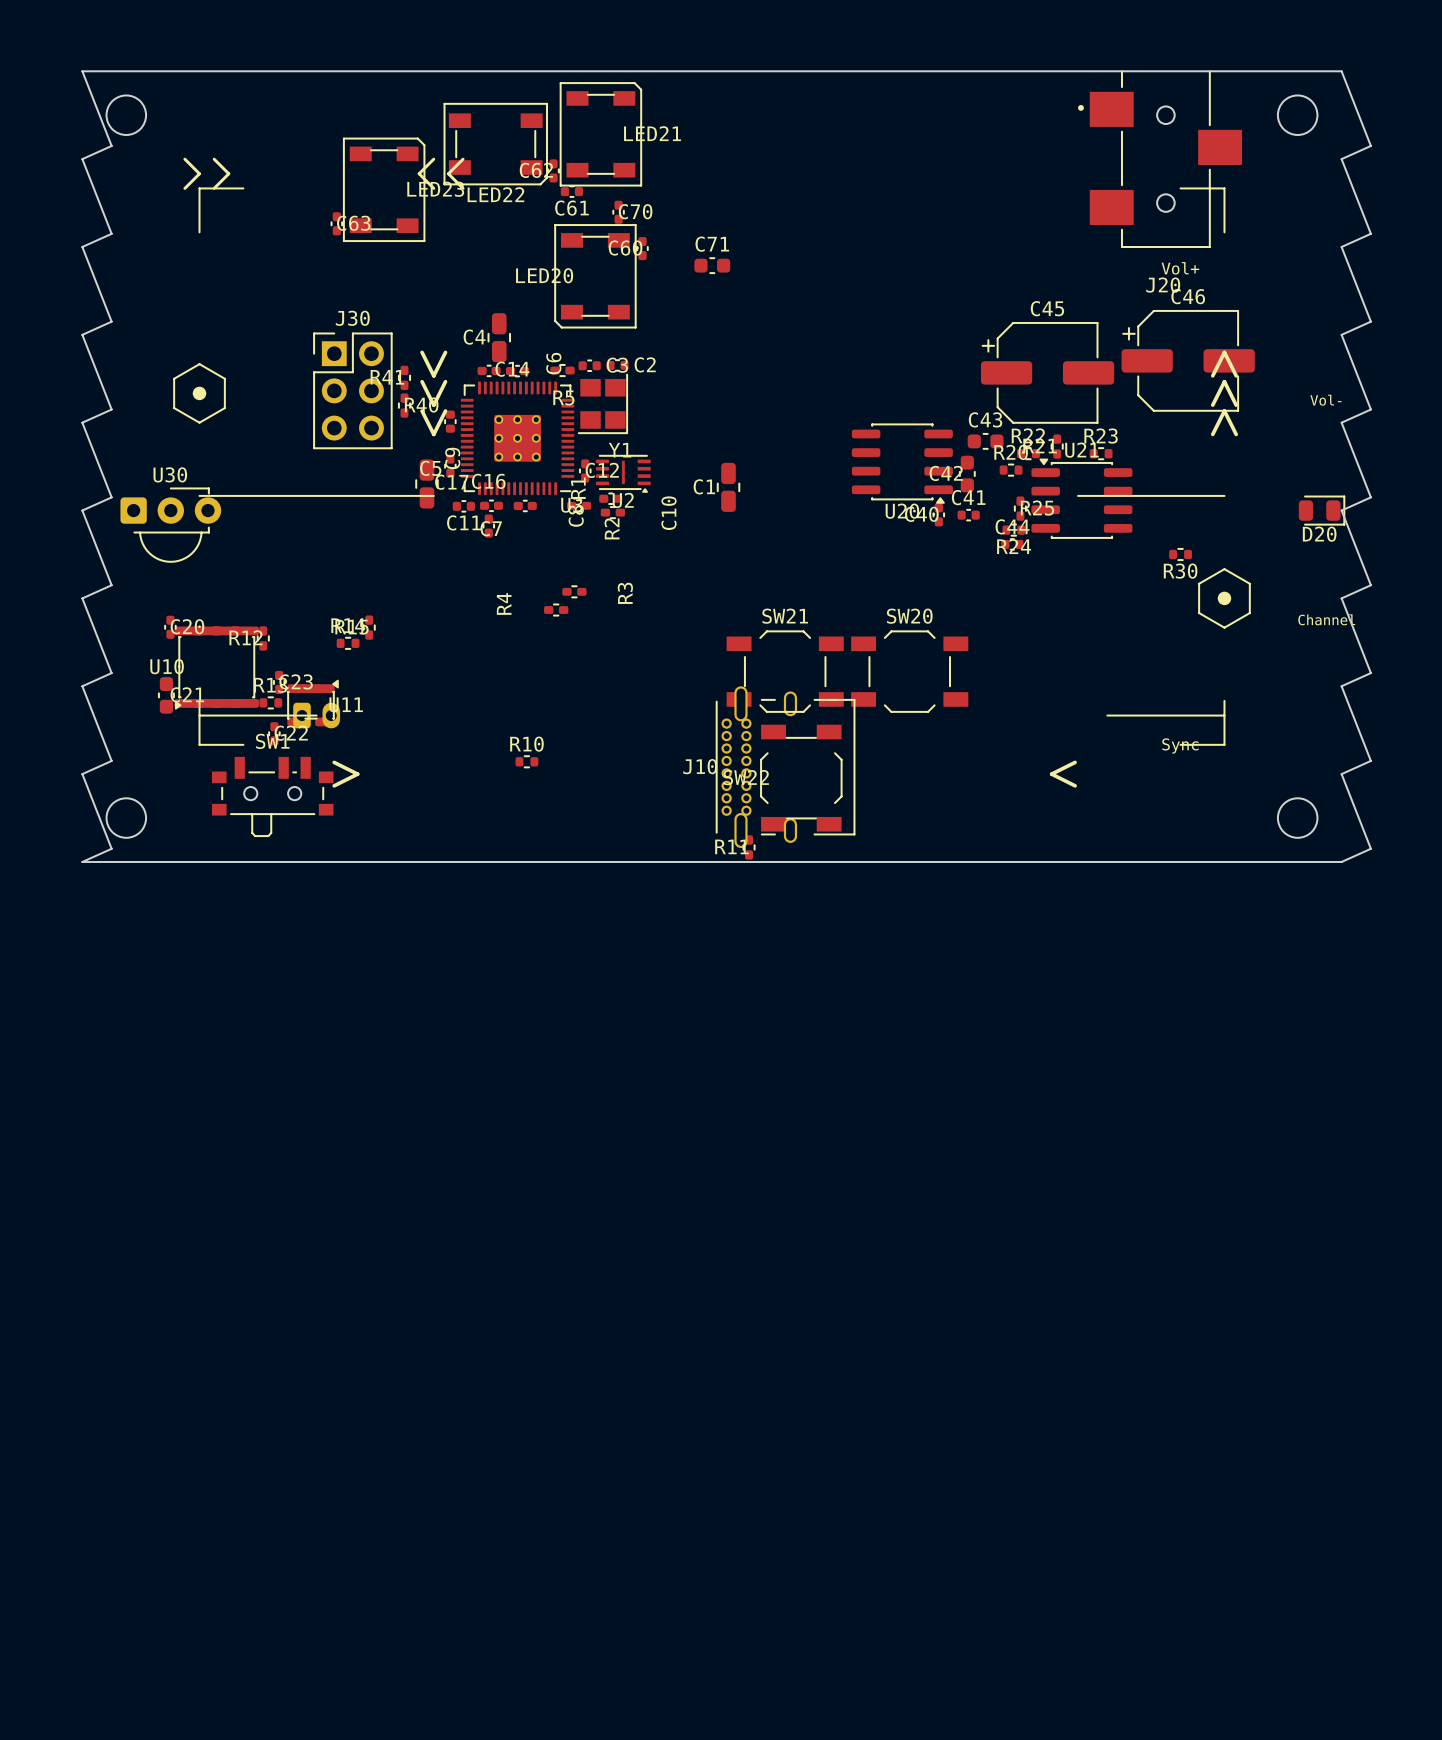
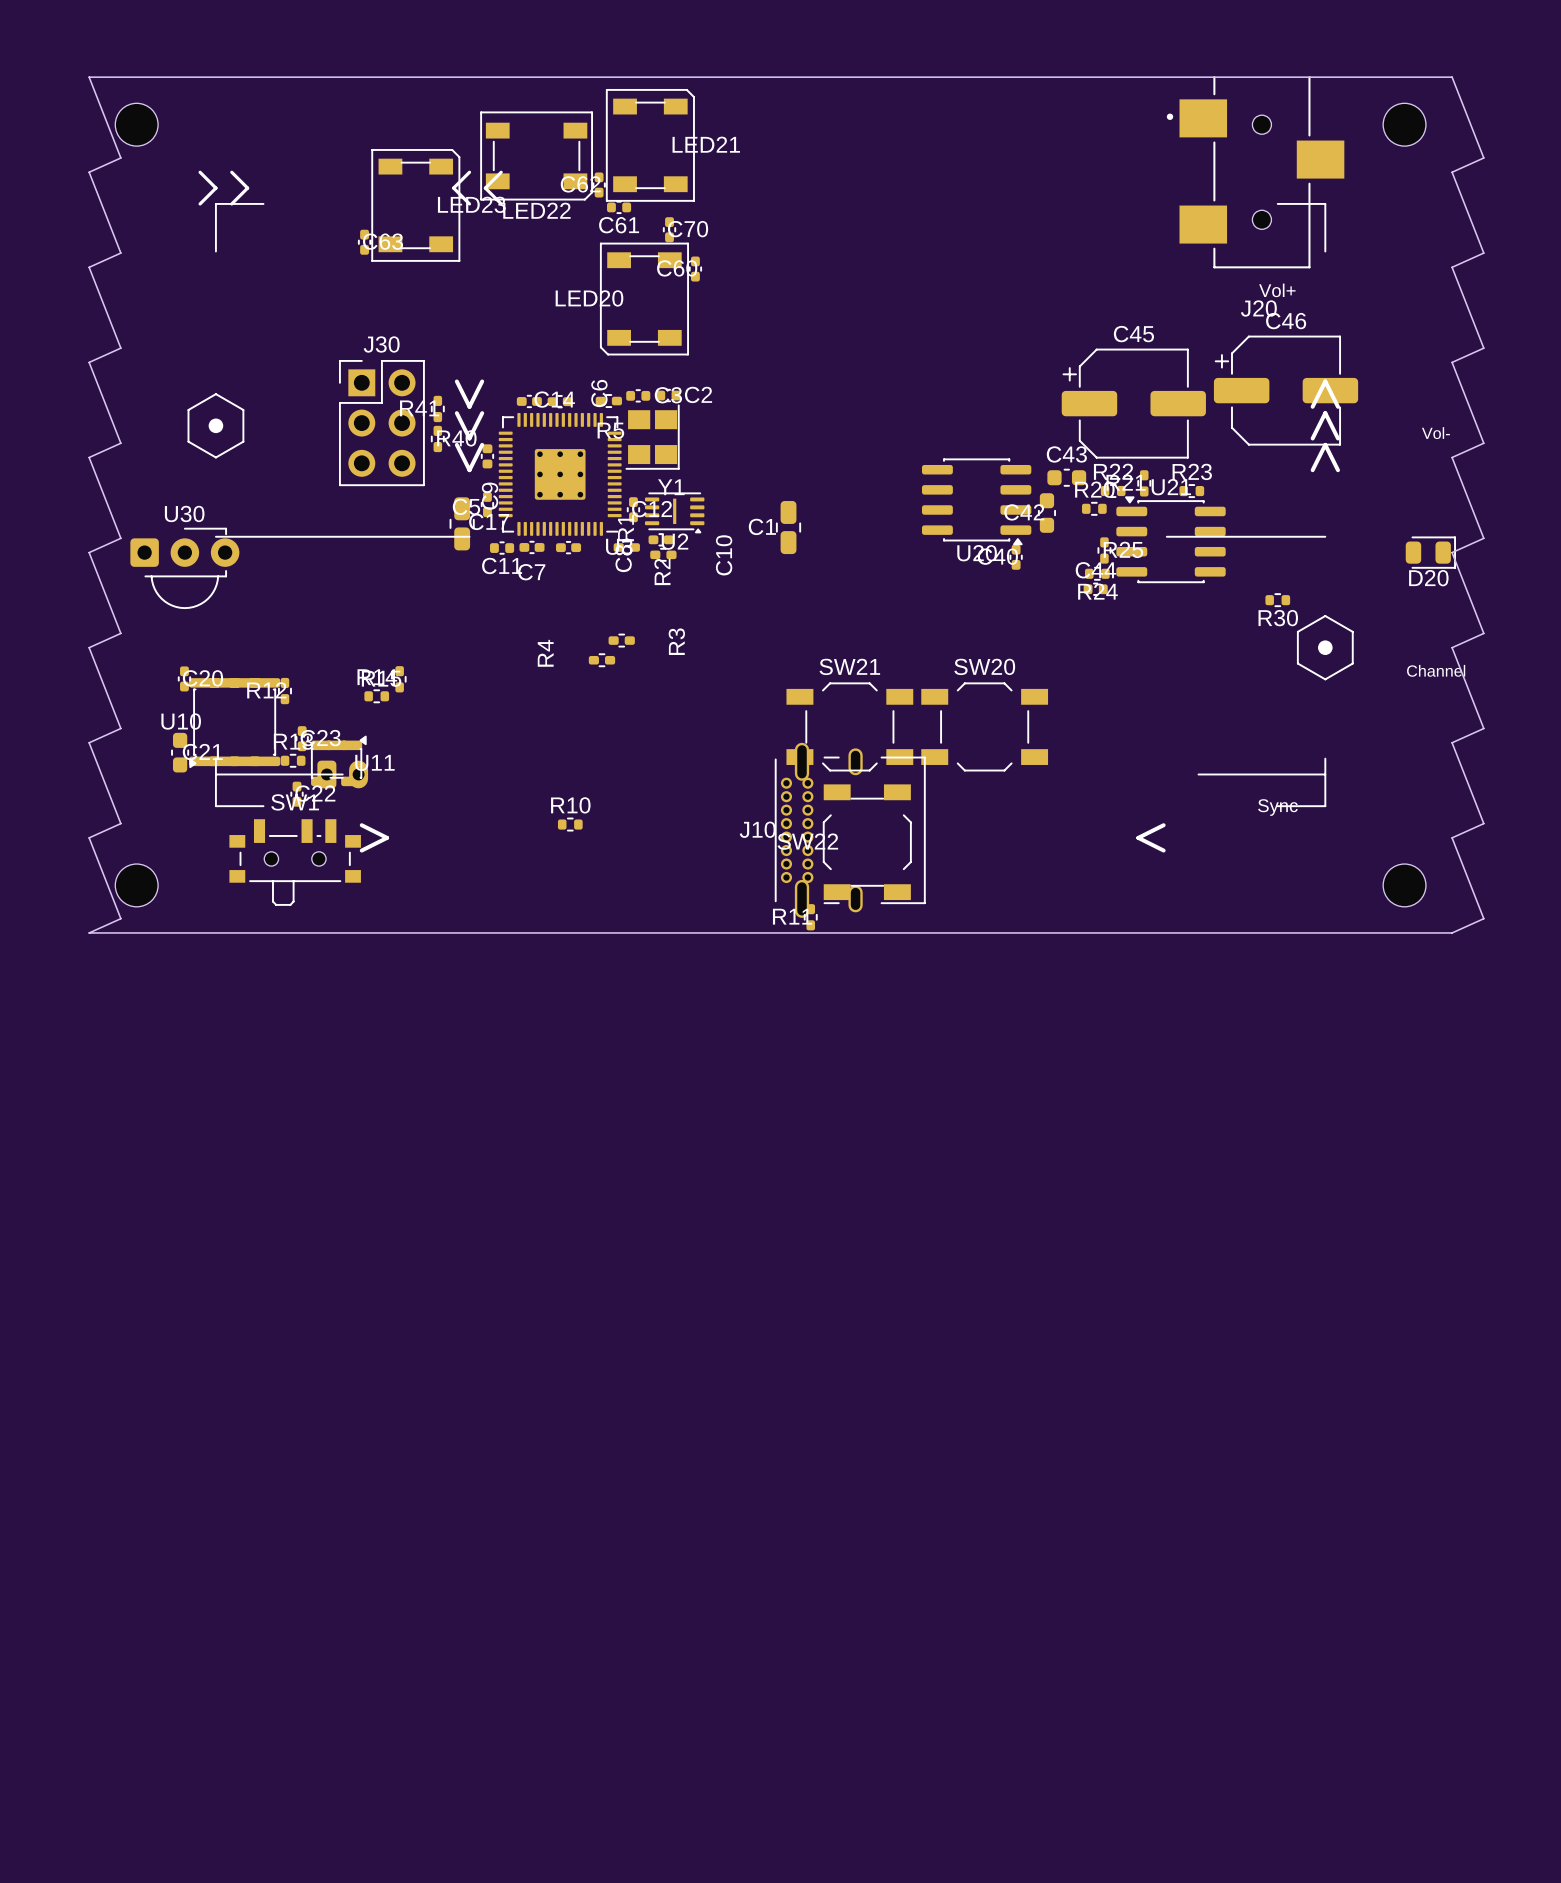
C71: (712, 265) -> none
C4: (499, 337) -> none
C41: (968, 515) -> none
C16: (488, 526) -> none

